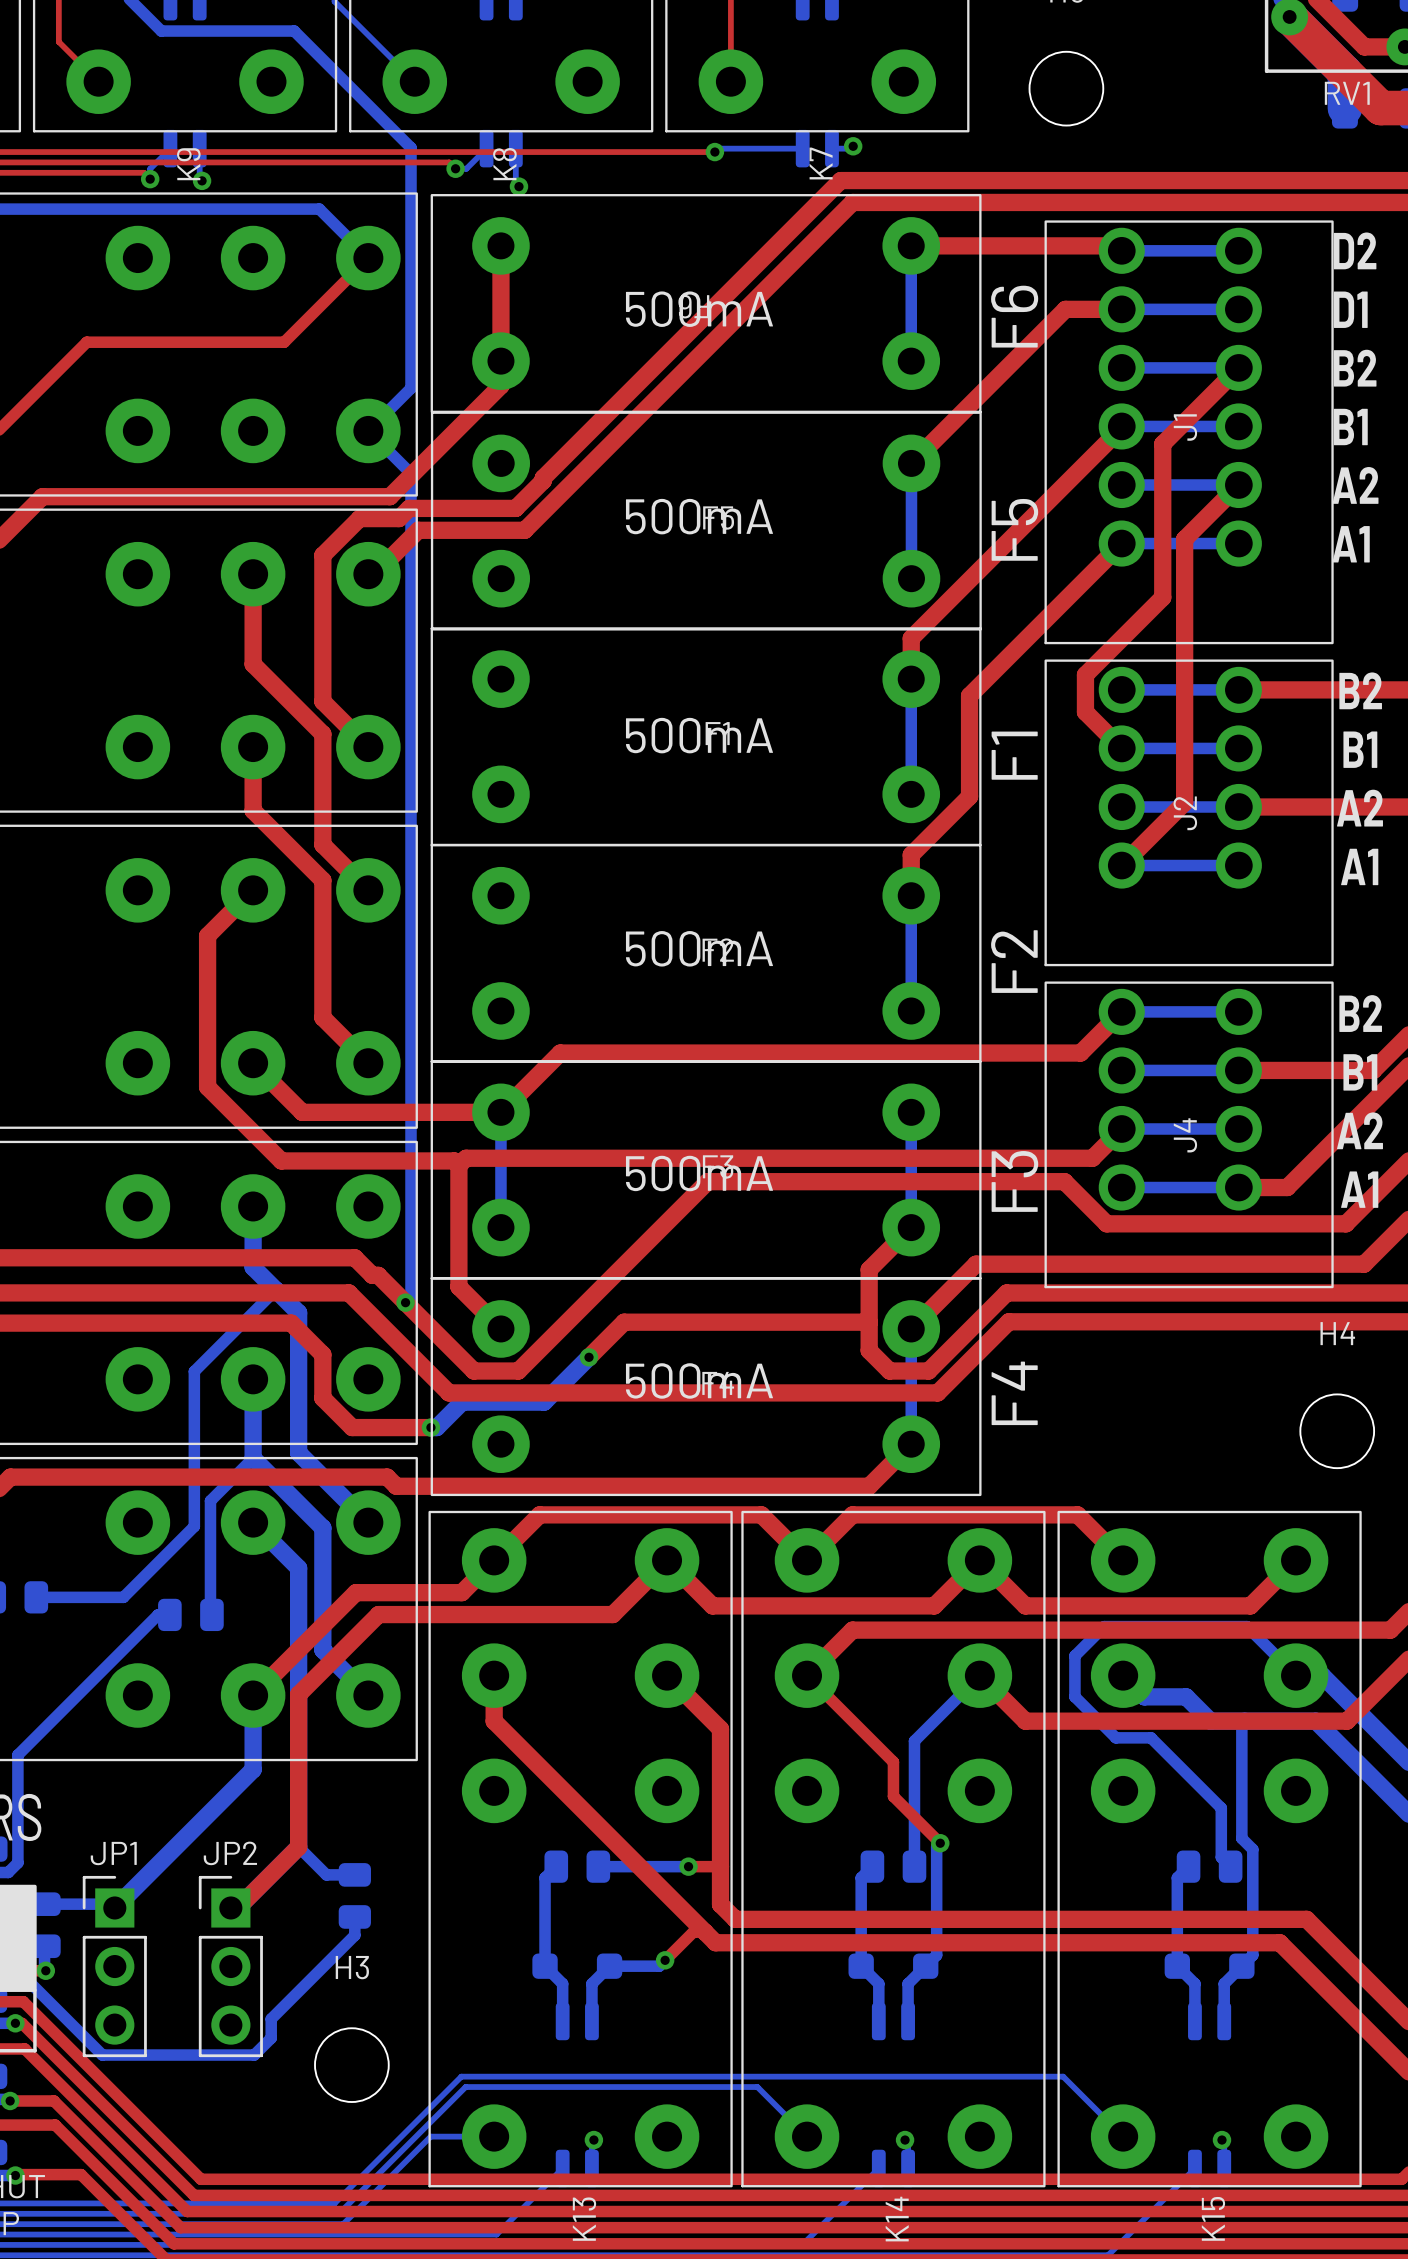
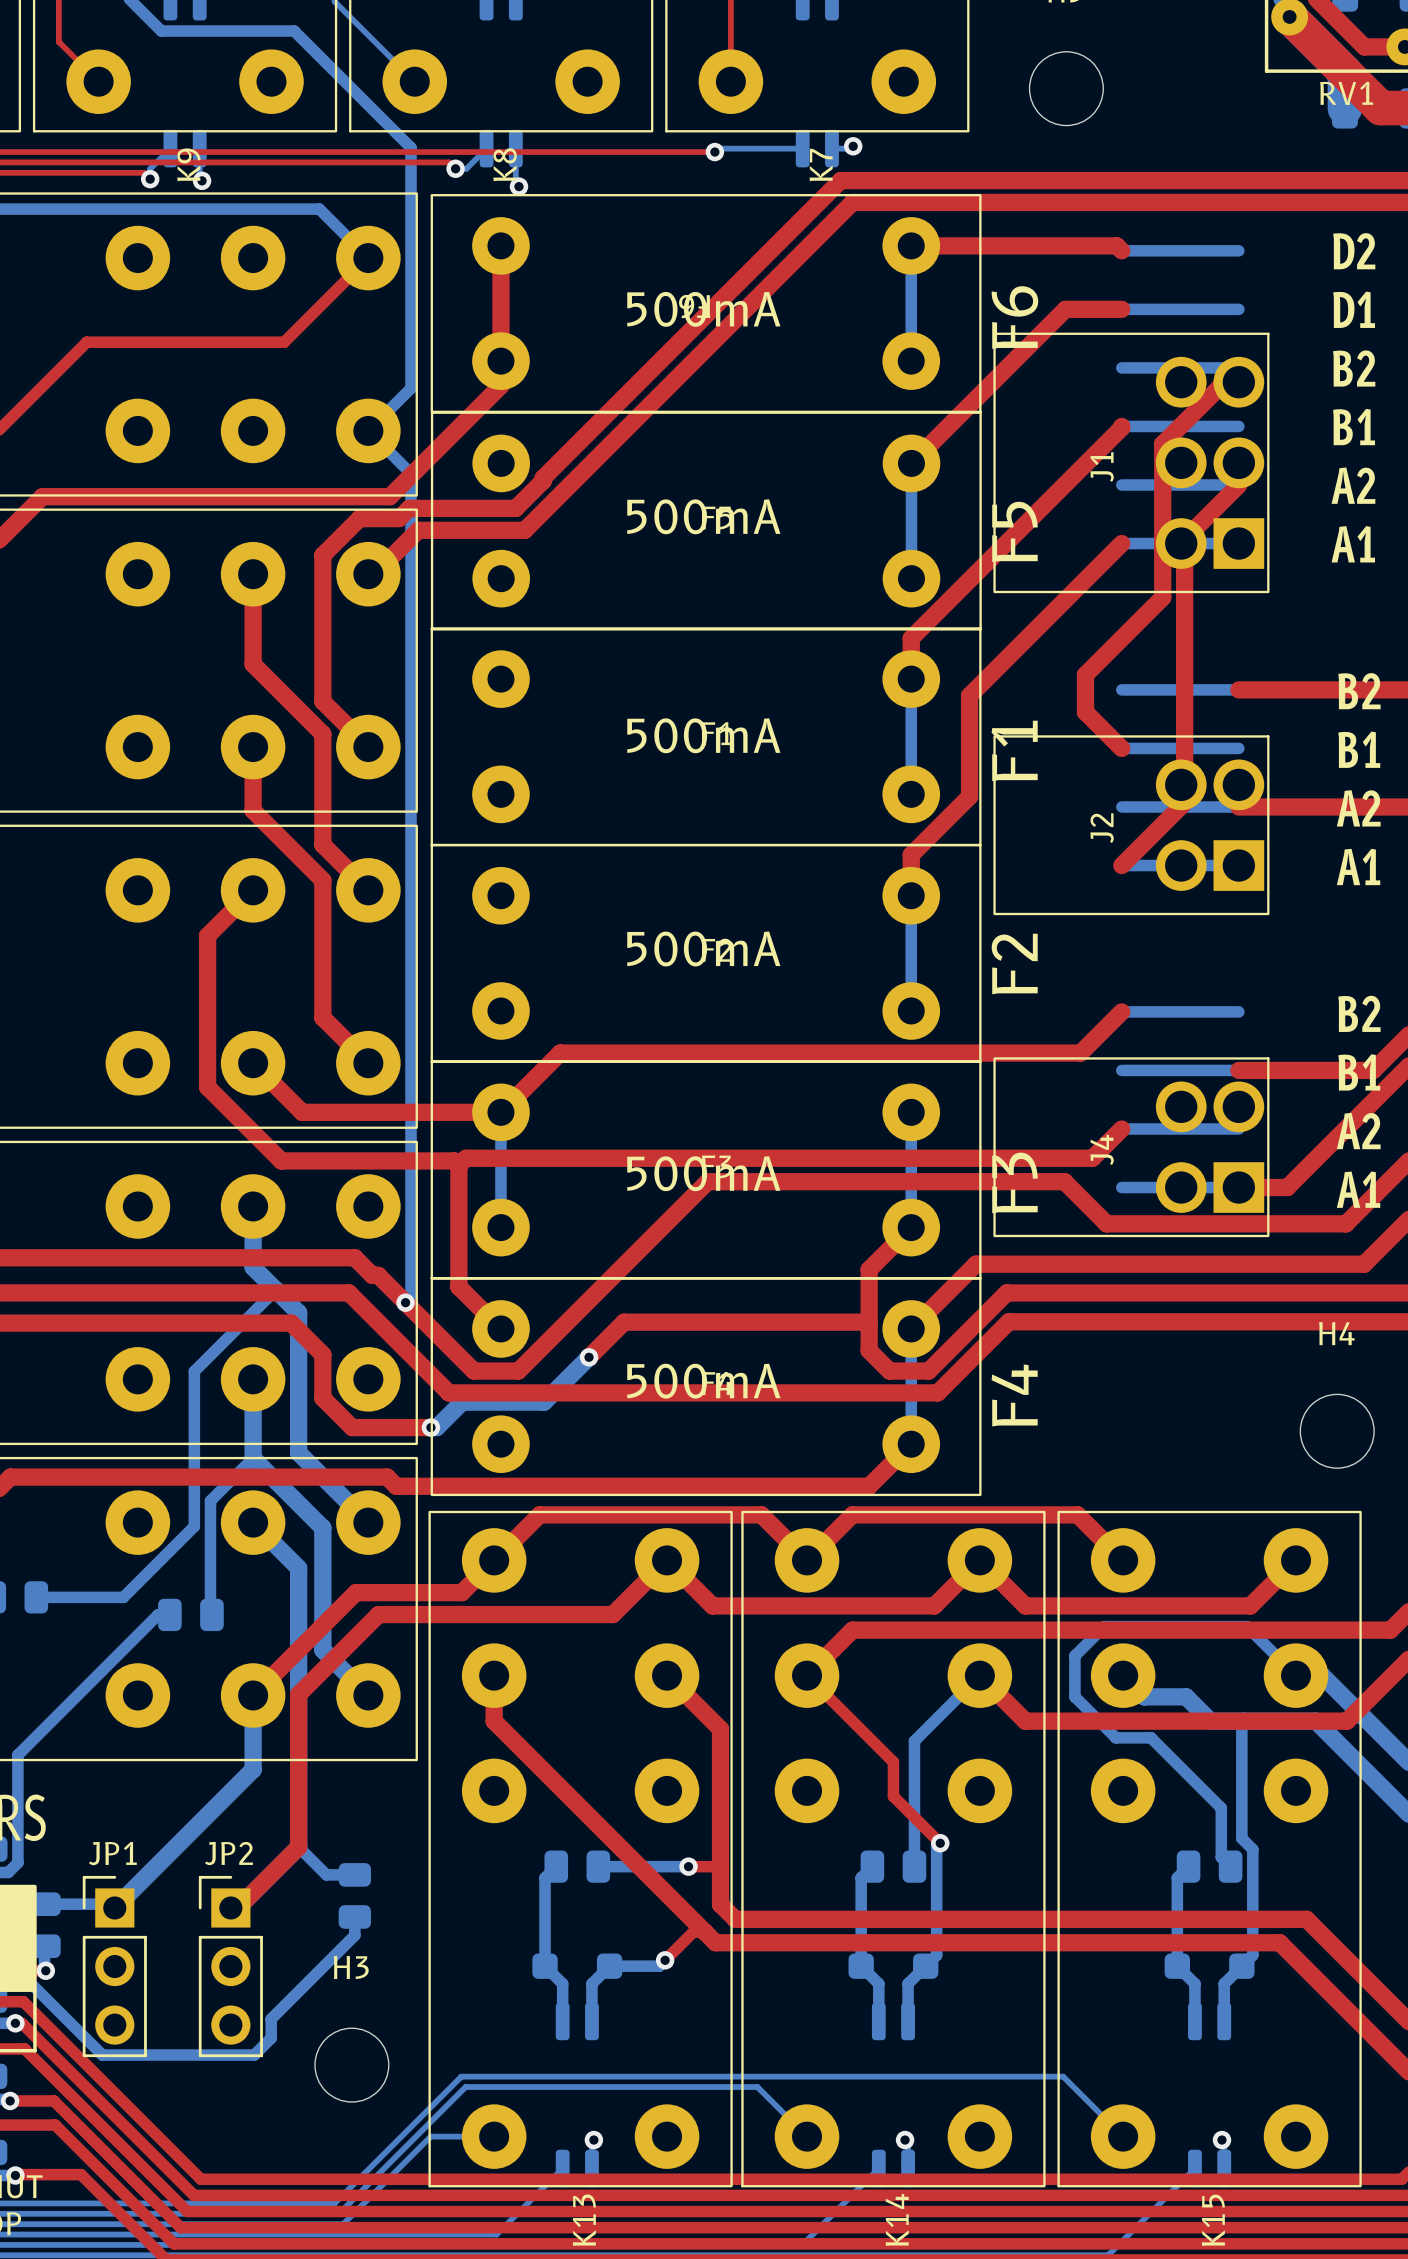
J1 footprint: [1044, 220, 1334, 645] -> [993, 332, 1270, 594]
J2 footprint: [1044, 659, 1334, 967] -> [993, 735, 1270, 916]
J4 footprint: [1044, 981, 1334, 1289] -> [993, 1057, 1270, 1238]

